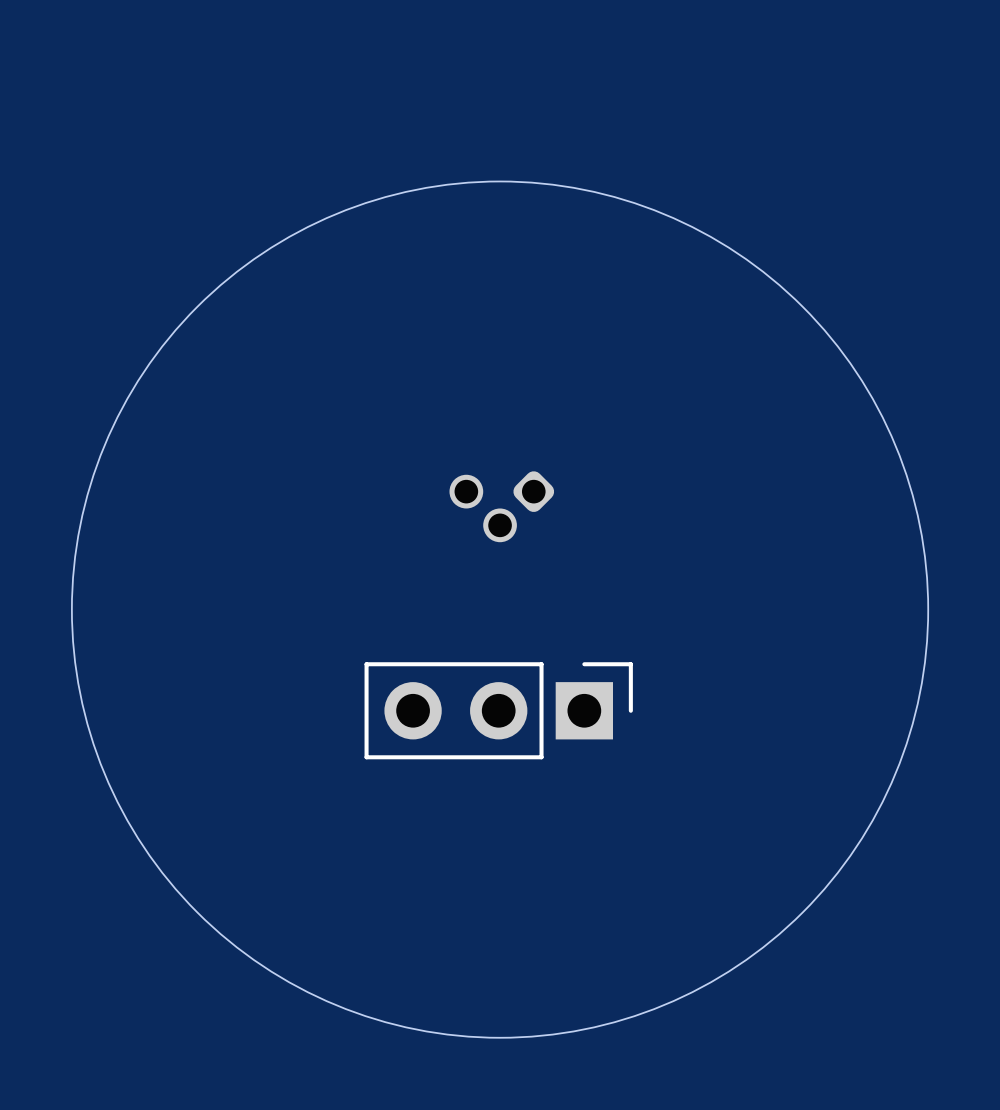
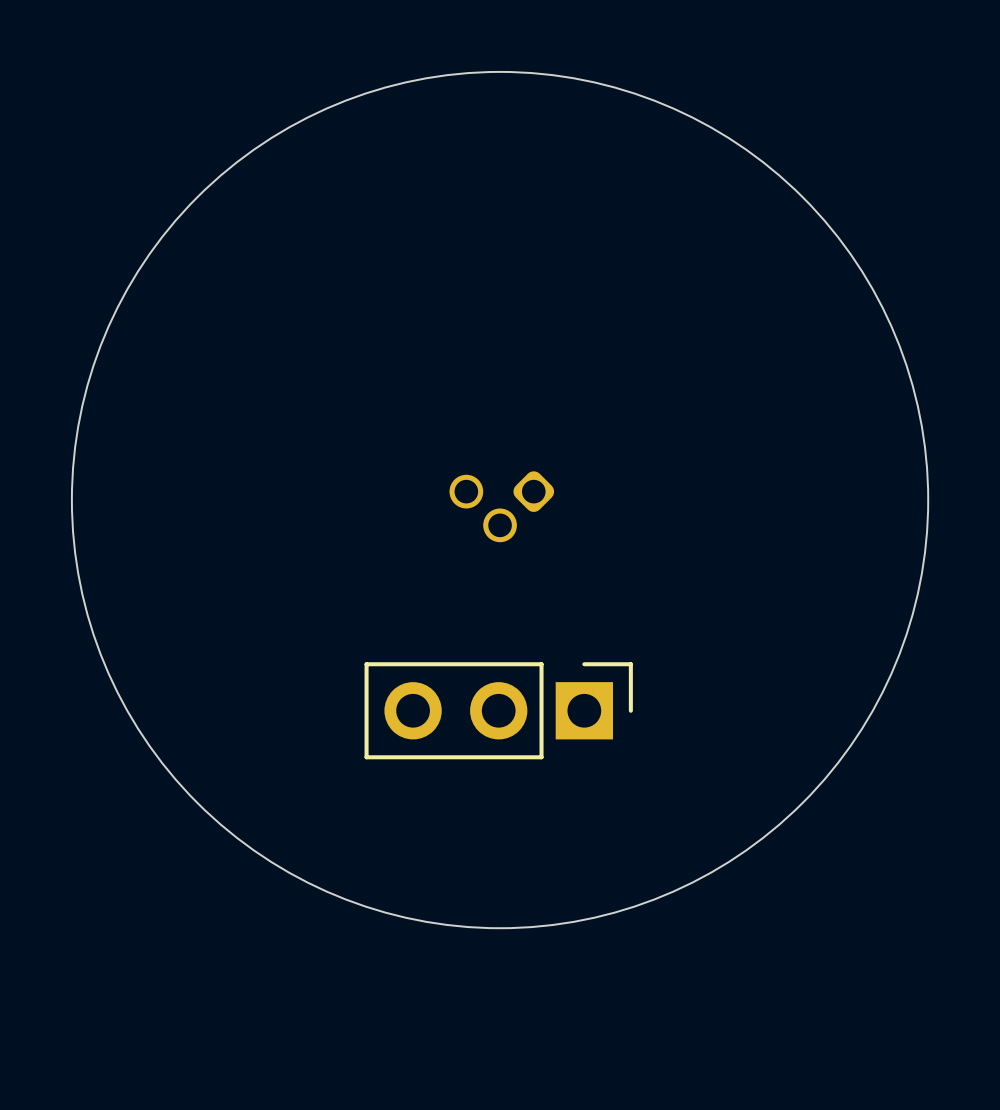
round board edge position: (500, 609) -> (500, 500)

